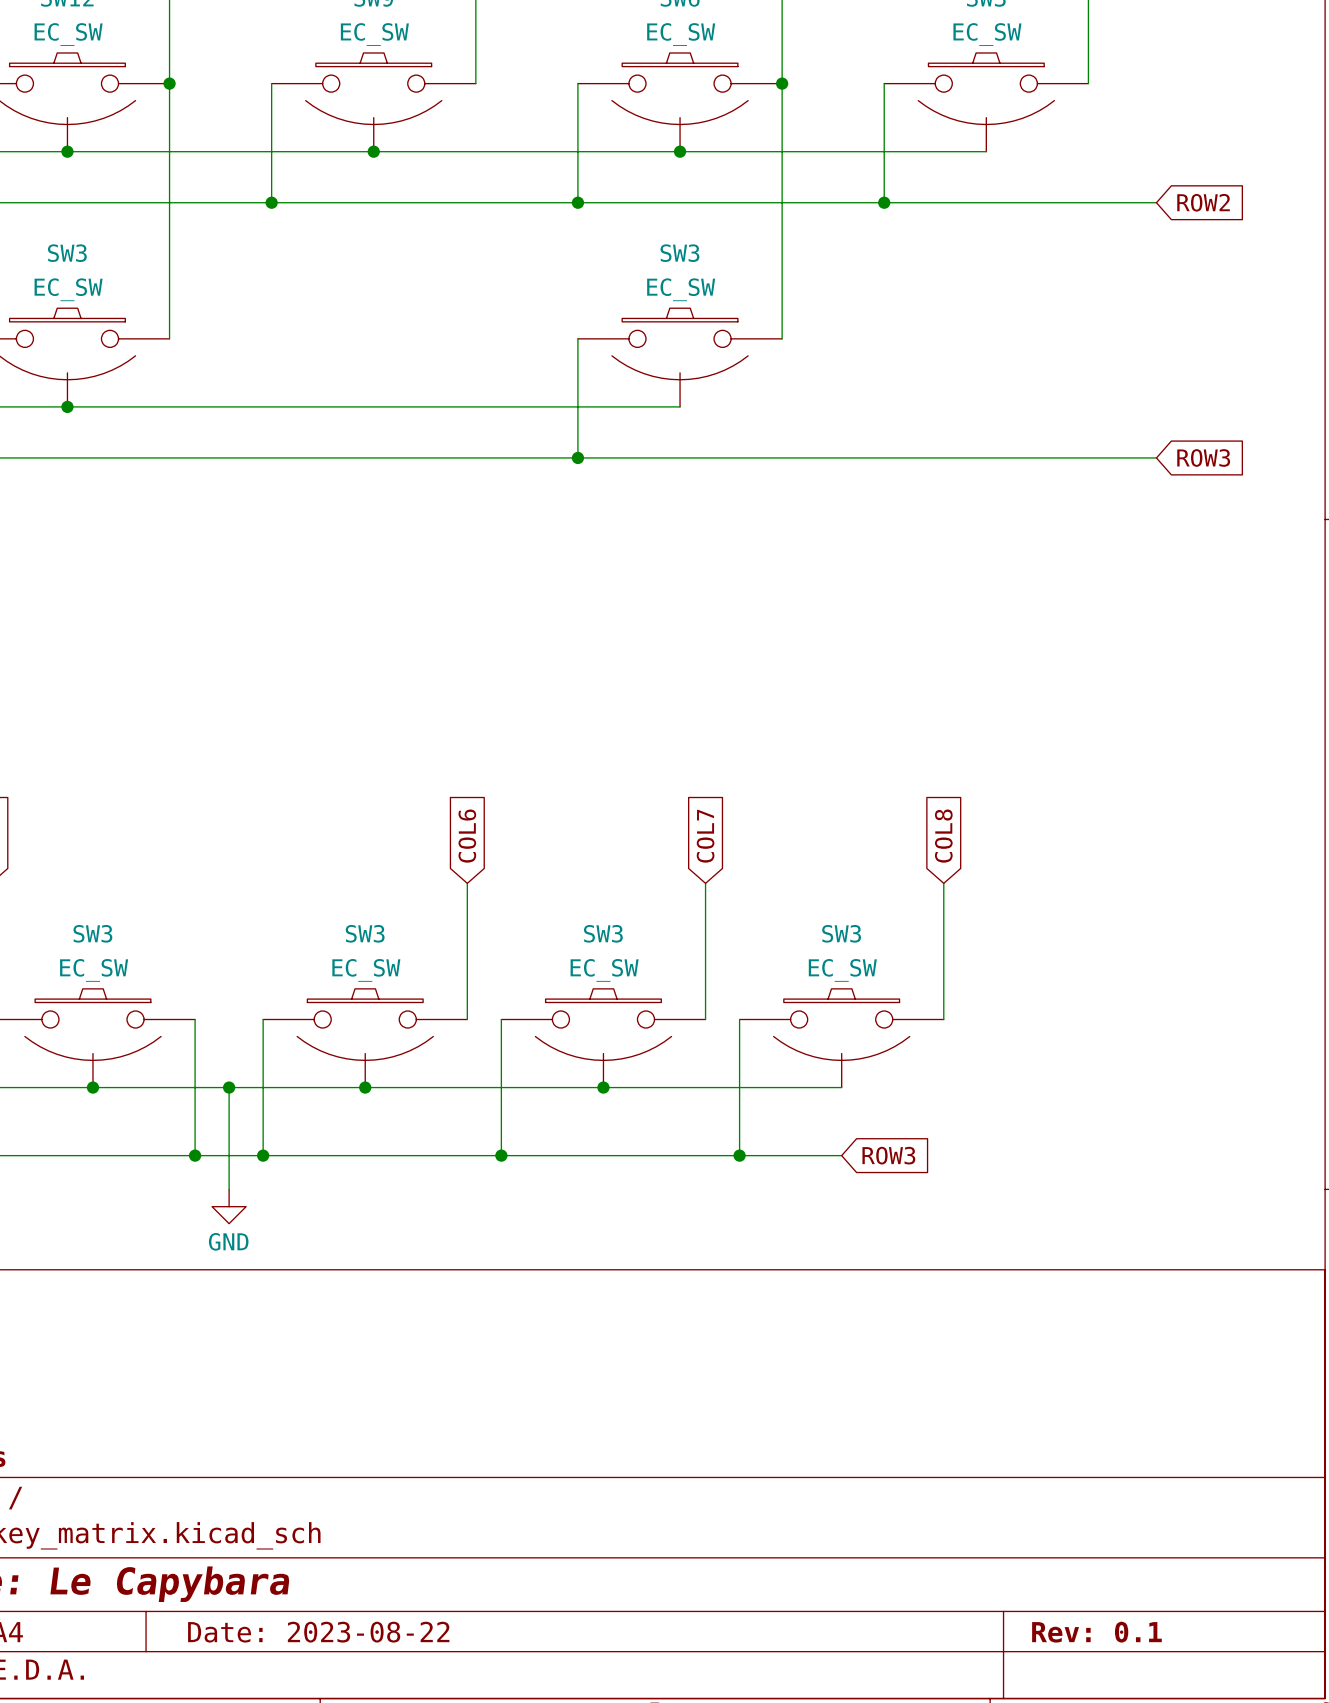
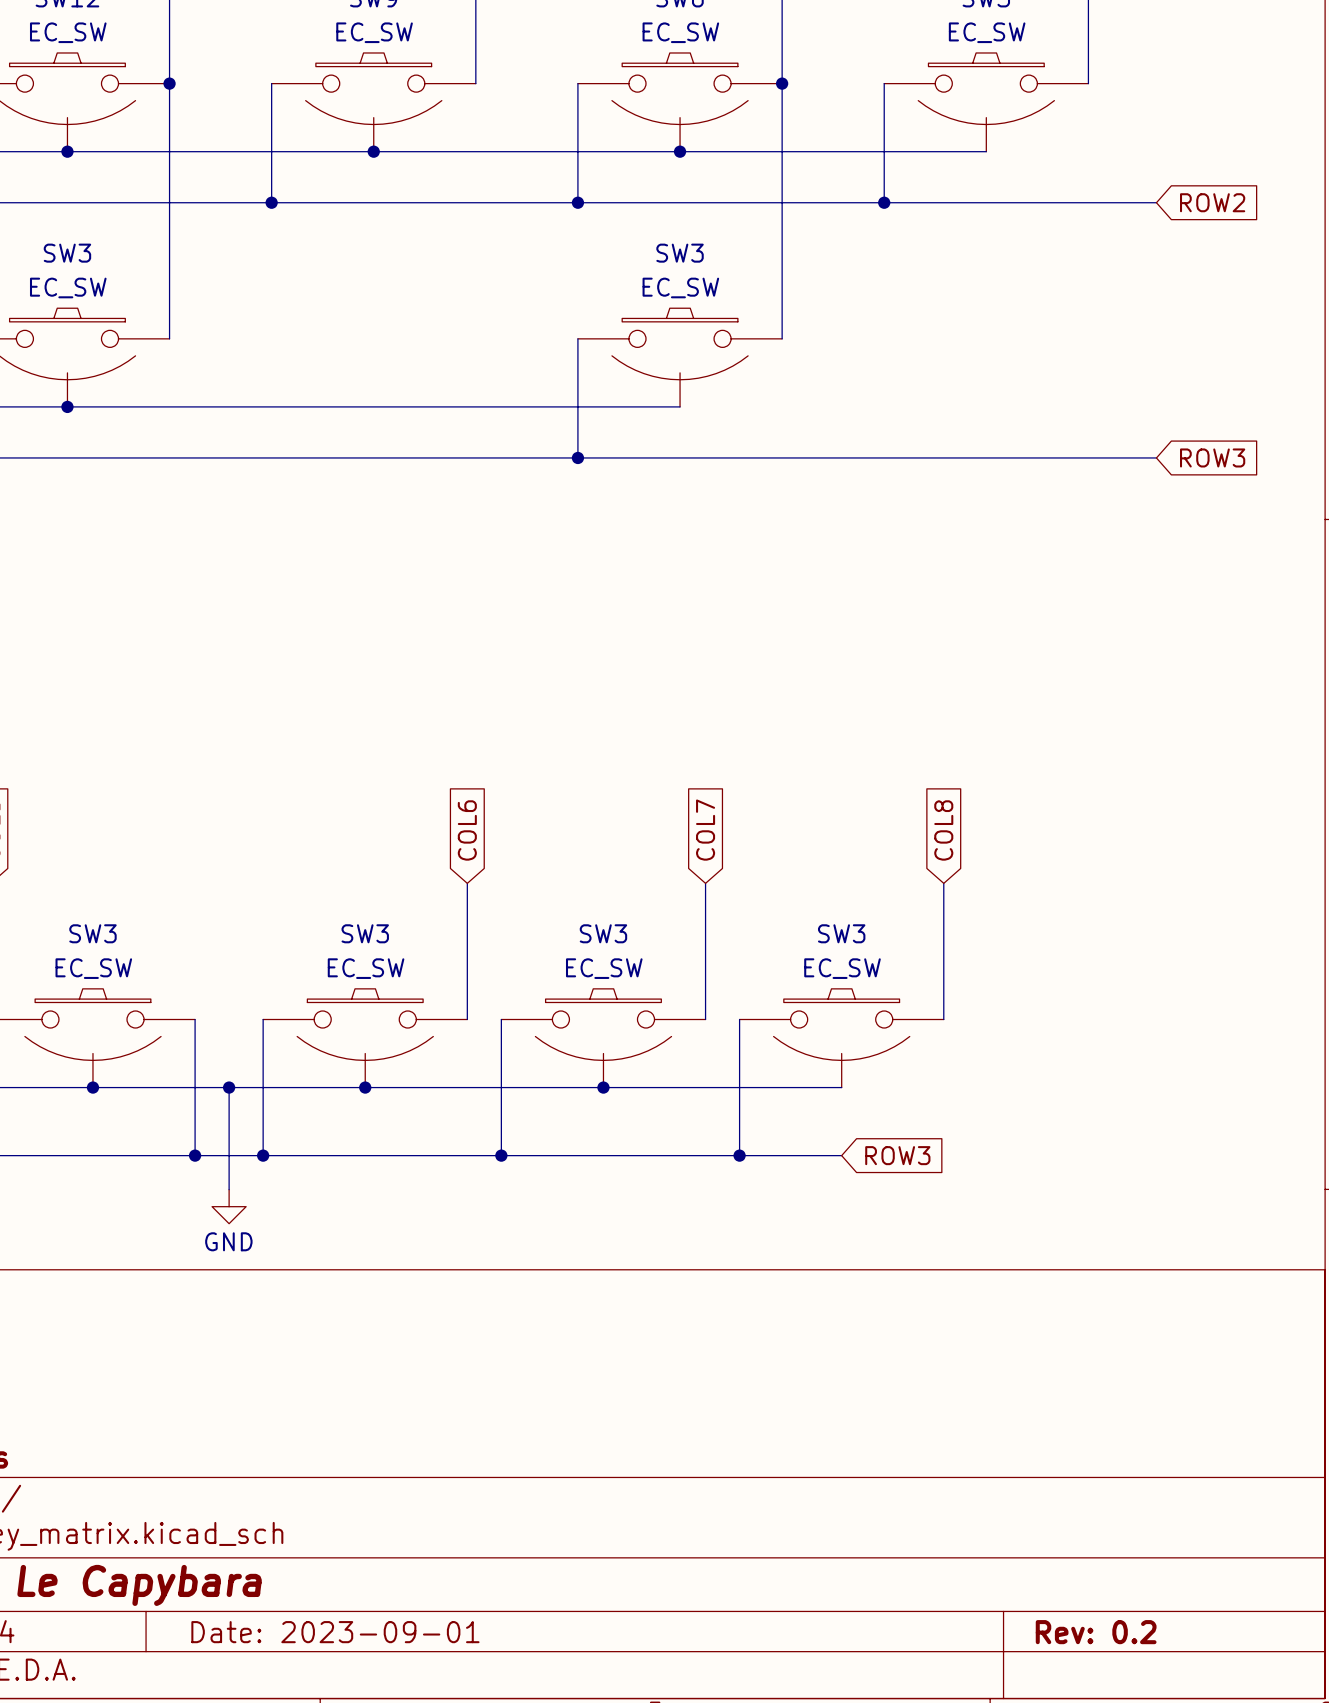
title block: Date: 2023-08-22 (318, 1632) -> Date: 2023-09-01 (335, 1632)
title block: Rev: 0.1 (1096, 1632) -> Rev: 0.2 (1096, 1632)

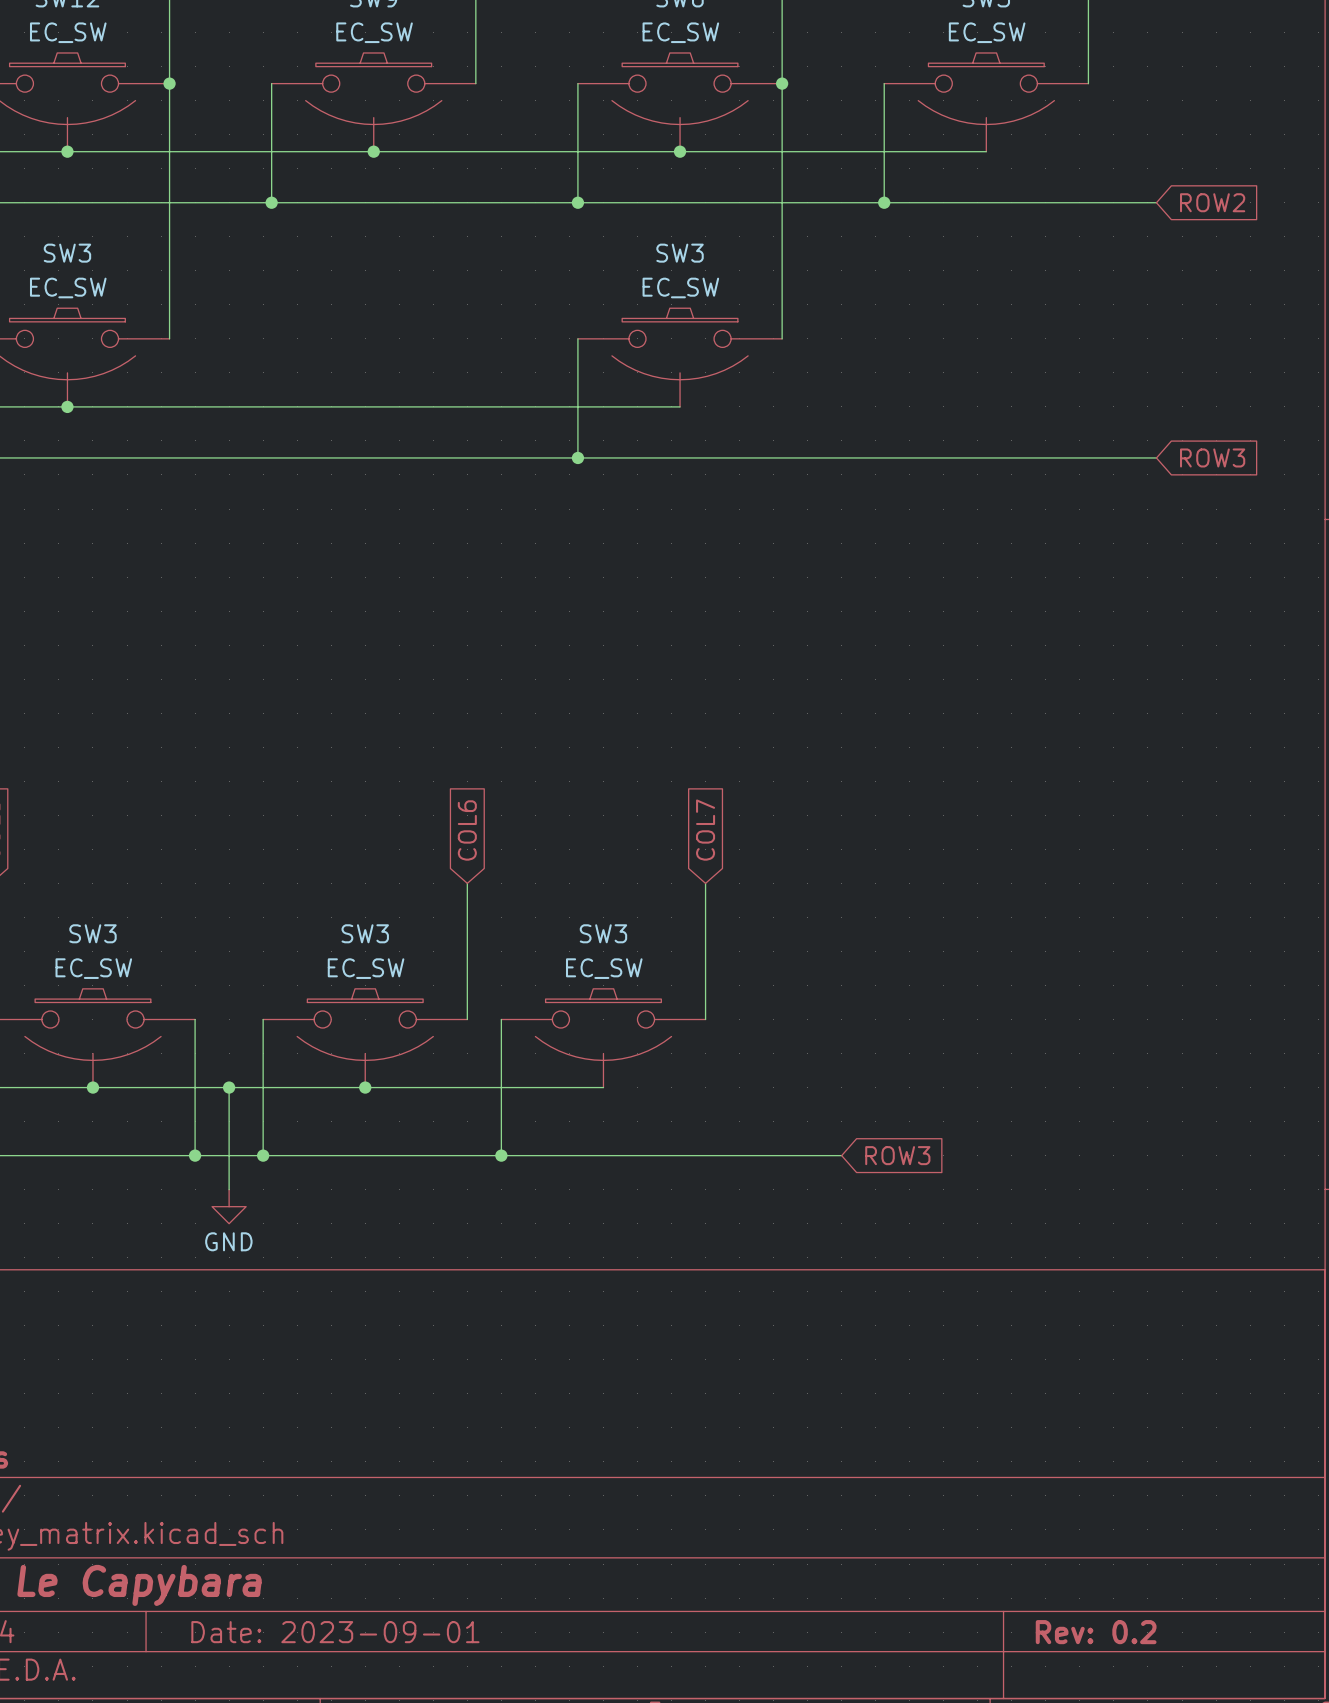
global label: COL8 (943, 830) -> none
wire: (943, 883) (943, 1019) -> none
wire: (739, 1019) (739, 1155) -> none
SW3: EC_SW (841, 1038) -> none
wire: (603, 1087) (841, 1087) -> none
junction: (603, 1087) -> none
junction: (739, 1155) -> none

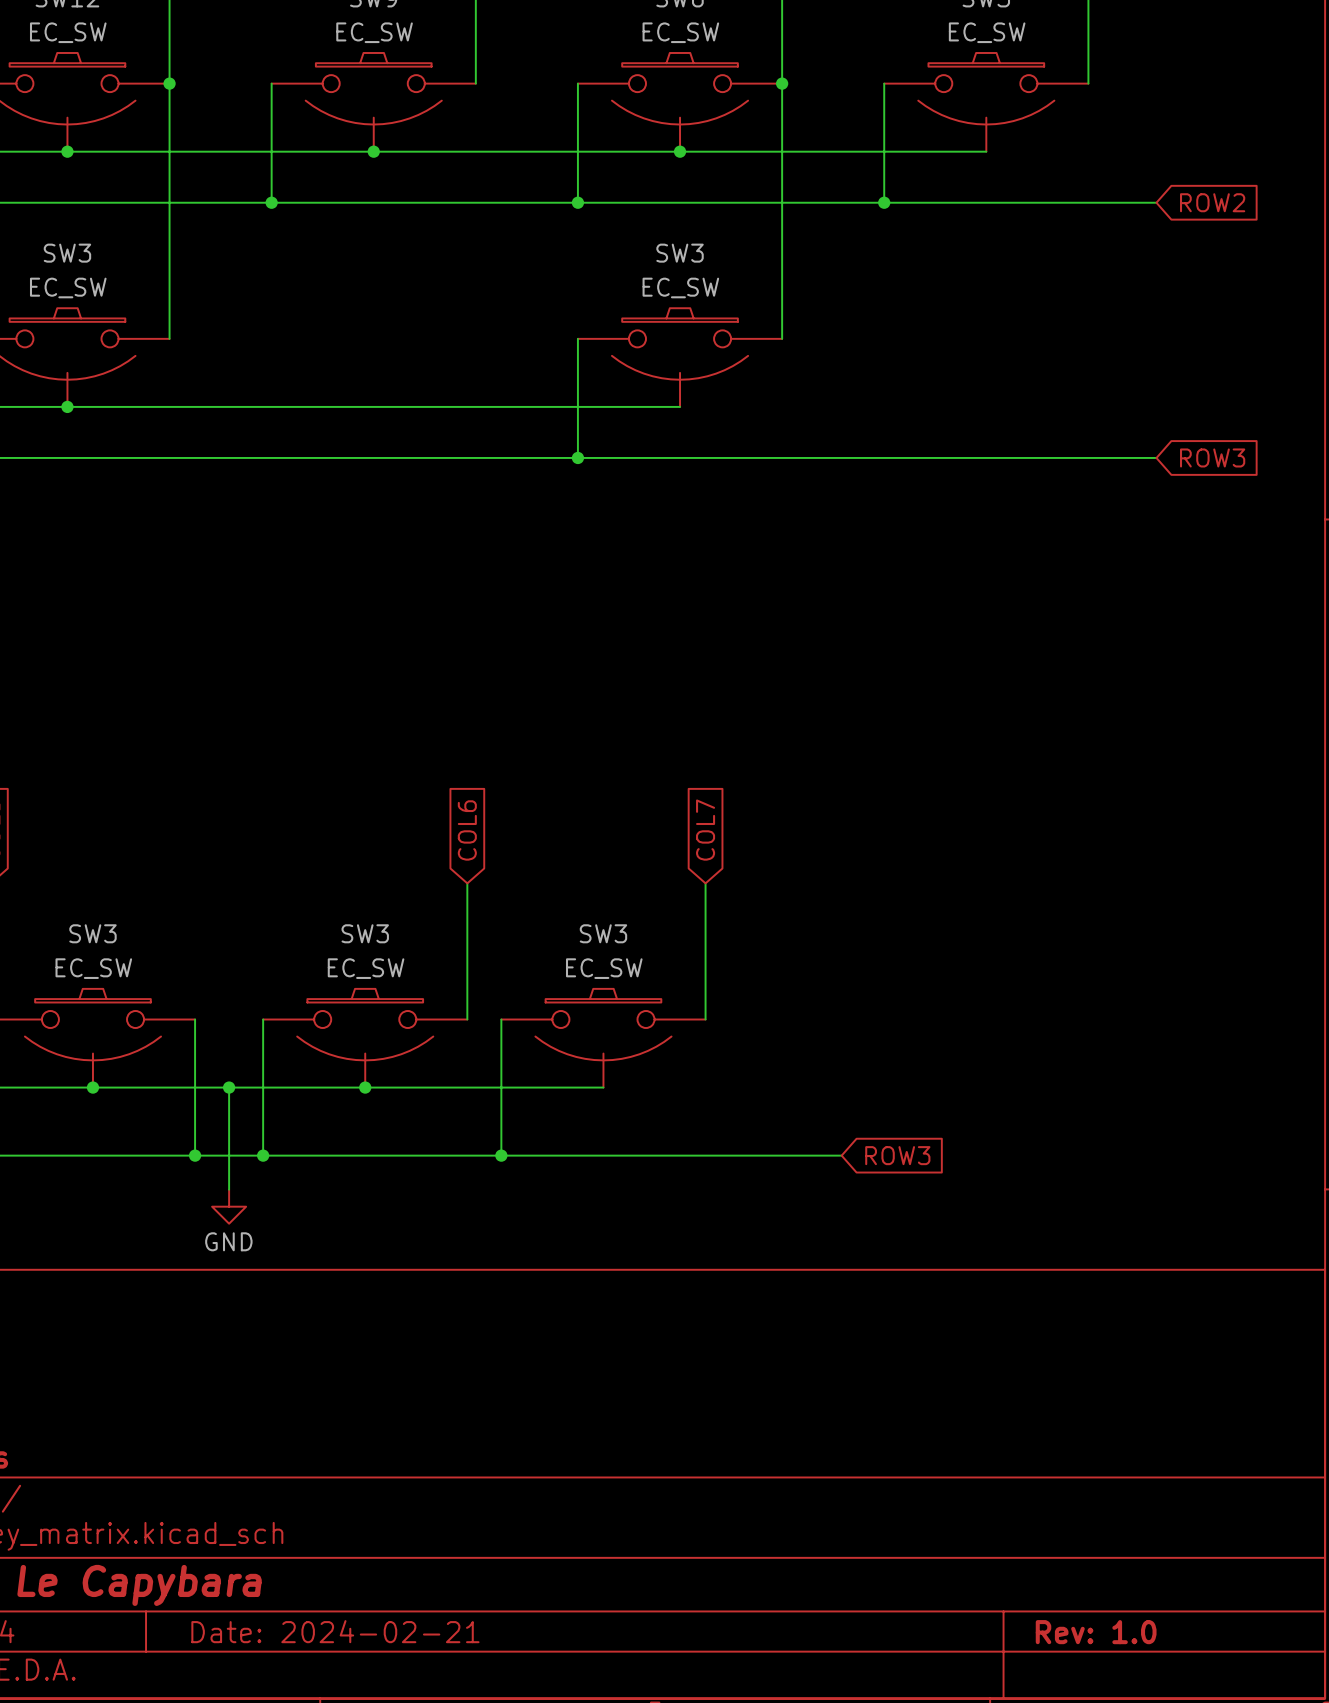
title block: Date: 2023-09-01 (335, 1632) -> Date: 2024-02-21 (335, 1631)
title block: Rev: 0.2 (1096, 1632) -> Rev: 1.0 (1096, 1632)

